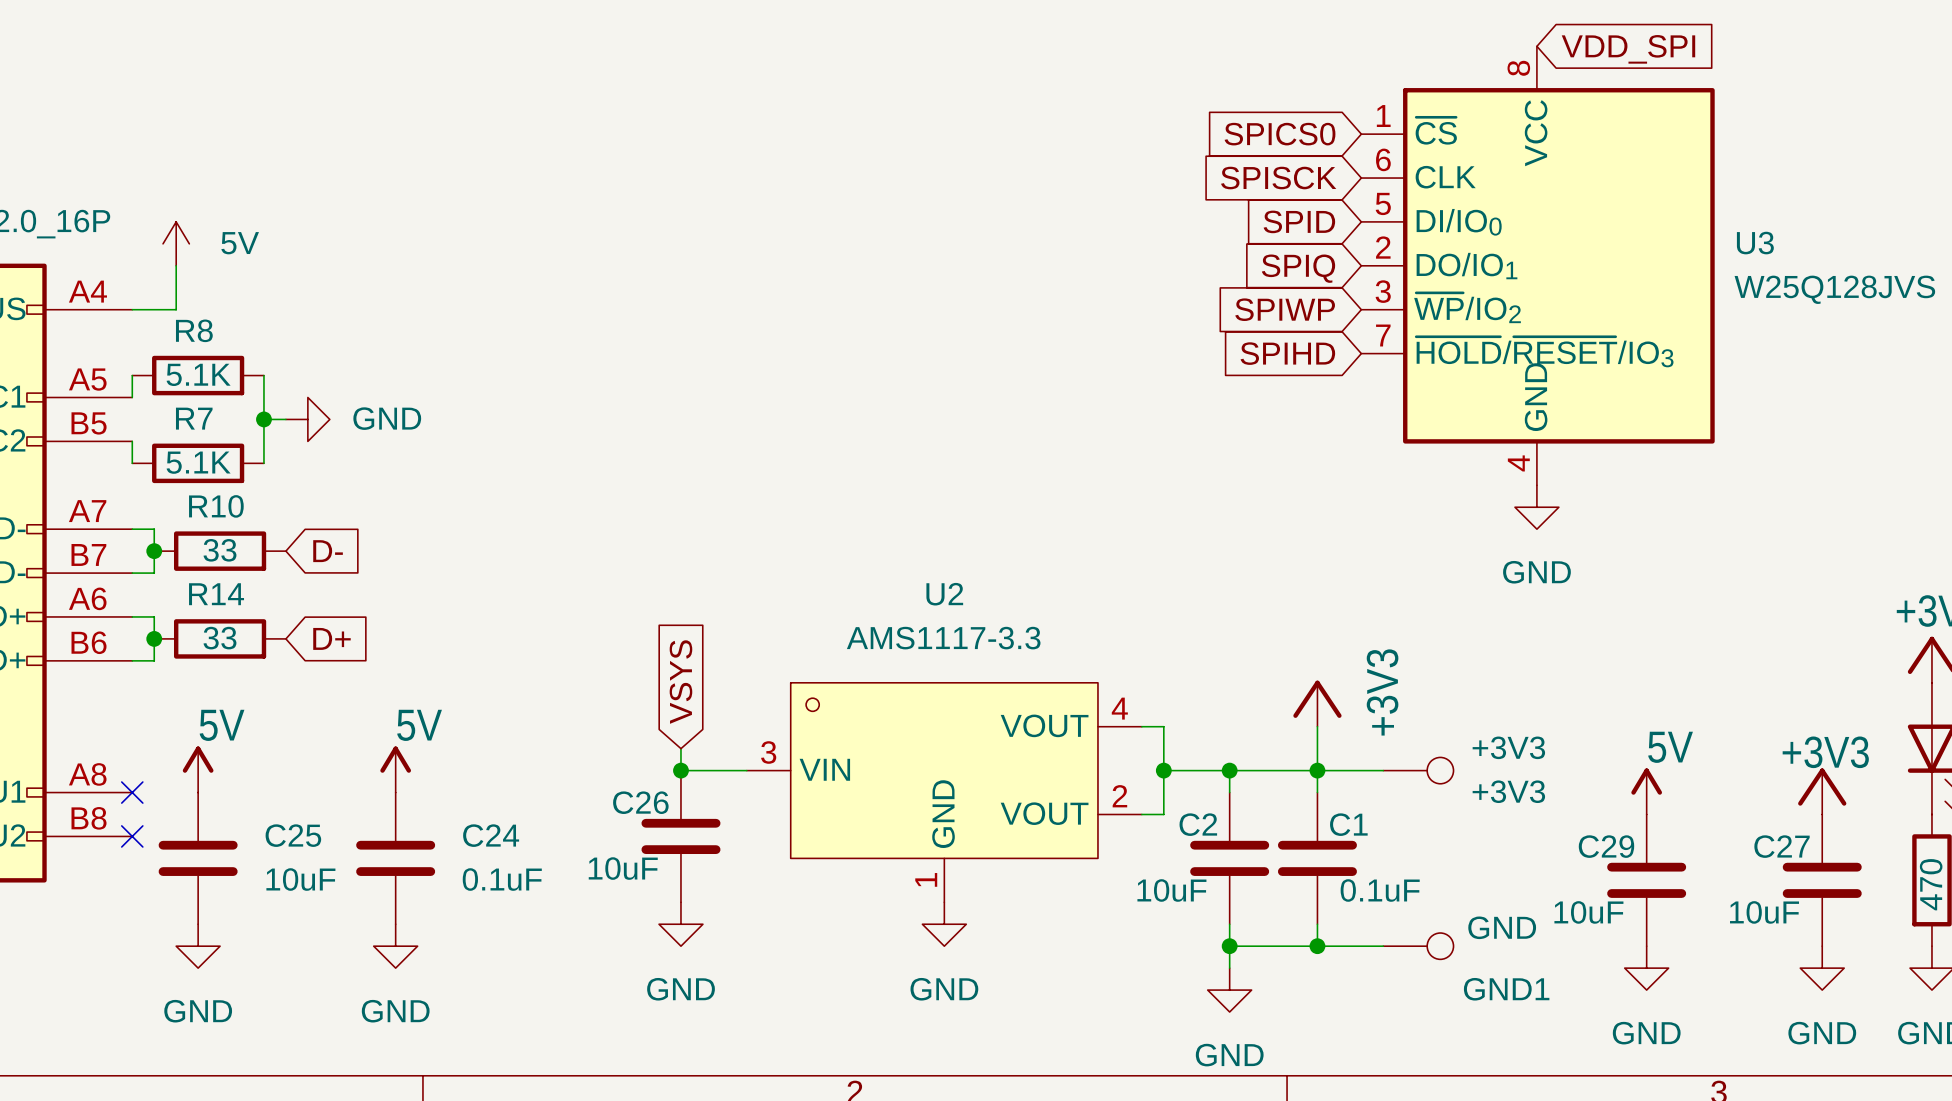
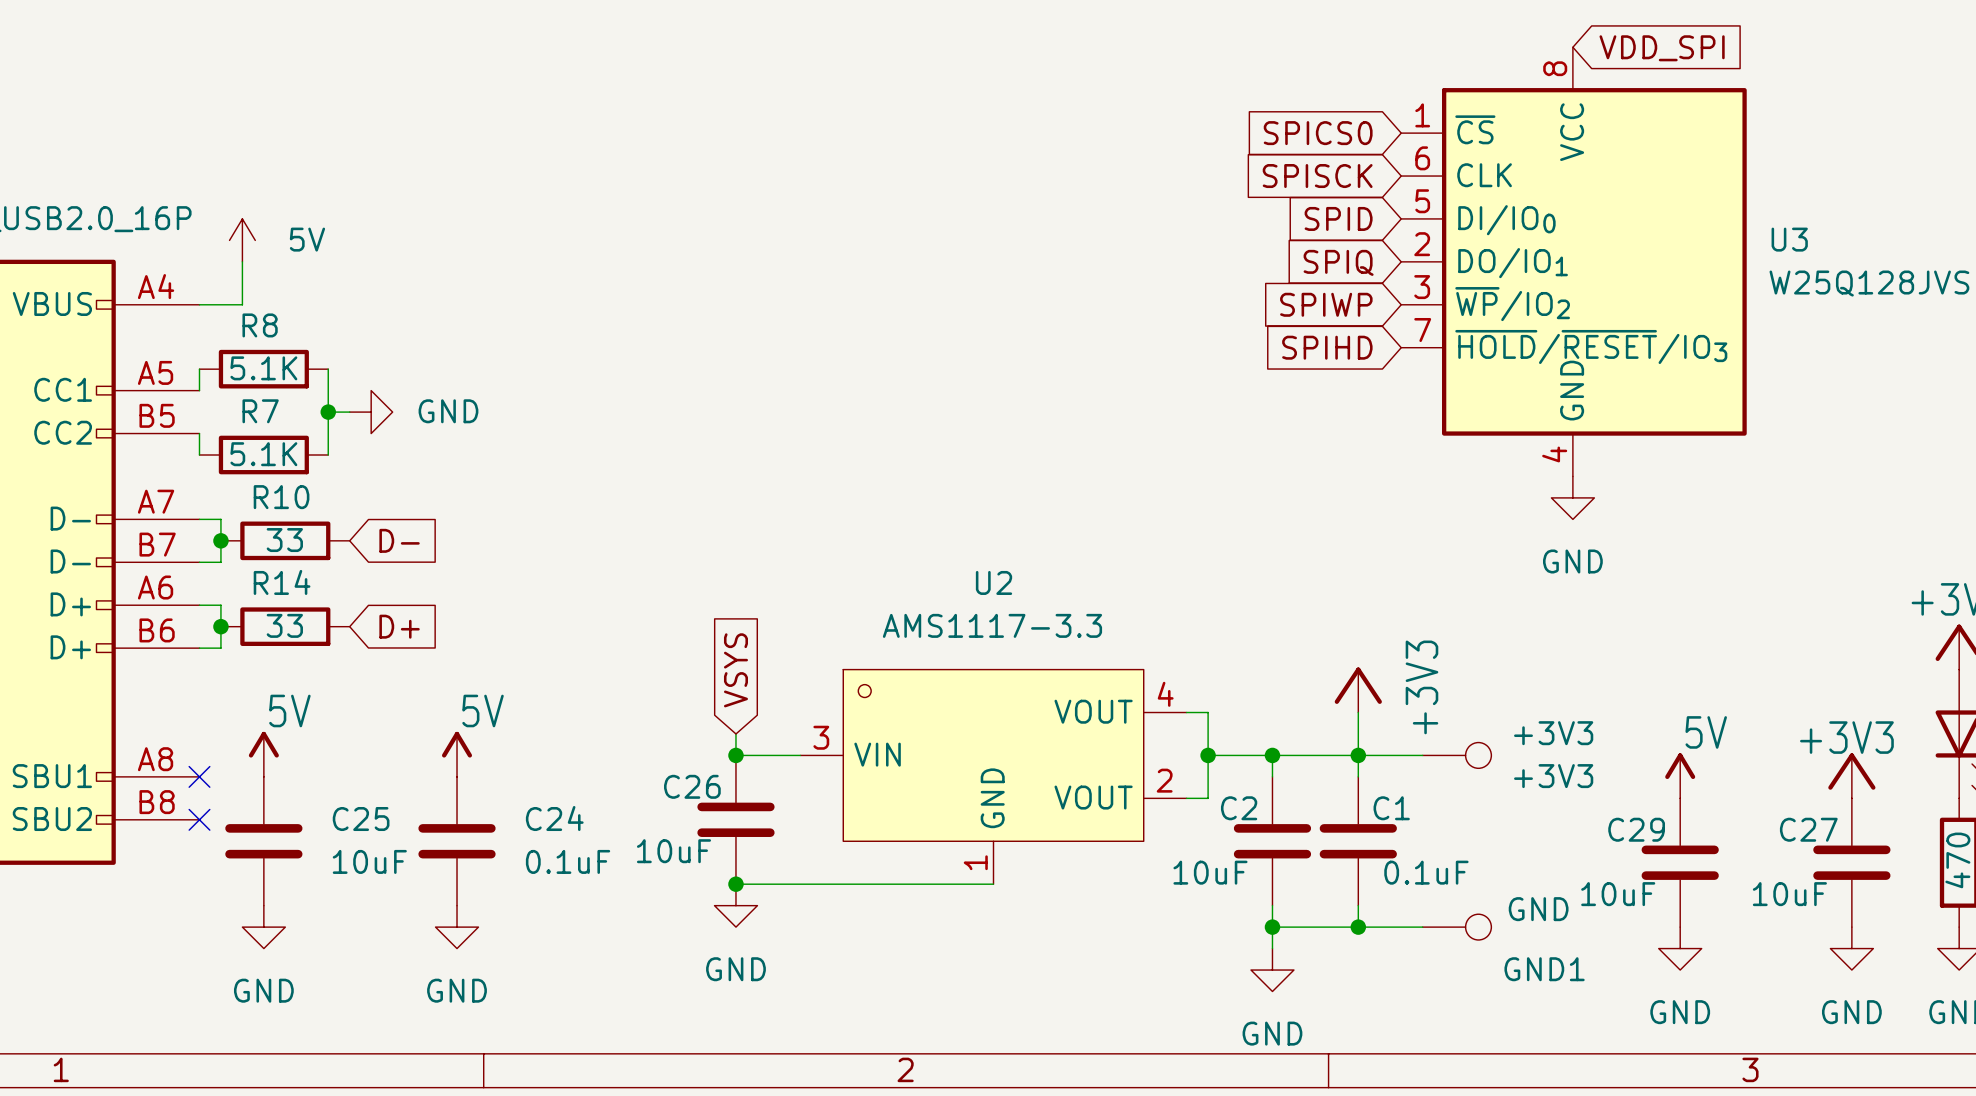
wire: none -> (735, 884) (993, 884)
junction: none -> (735, 884)
power symbol: GND (944, 924) -> none

